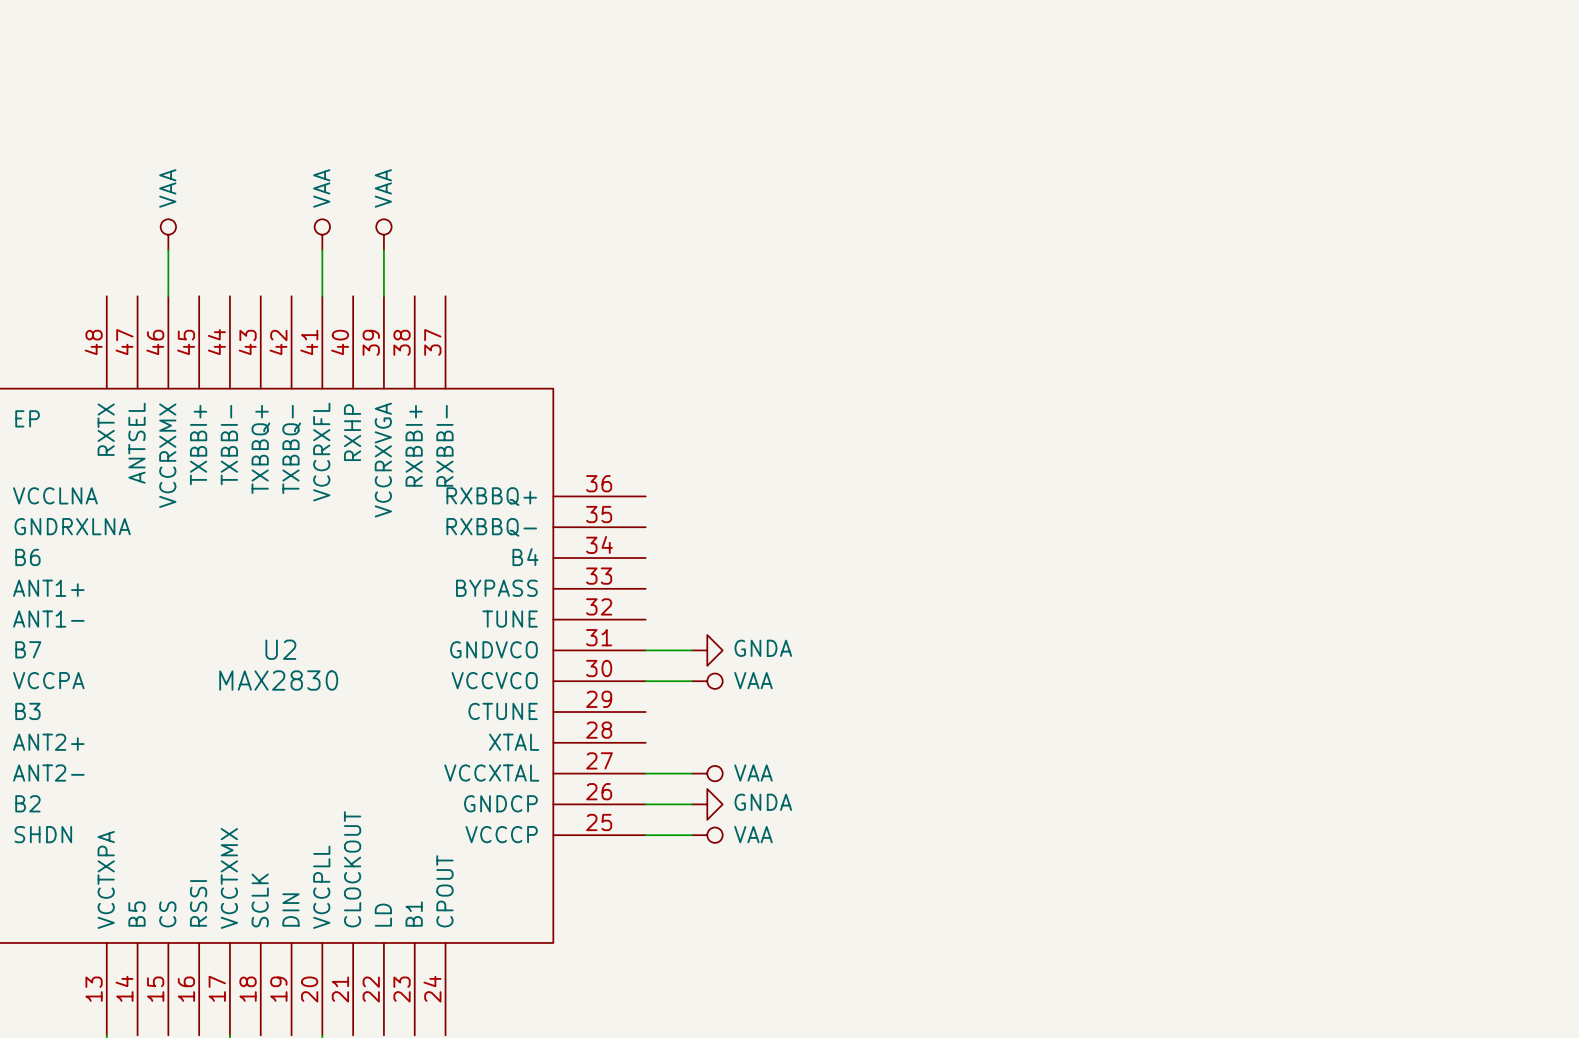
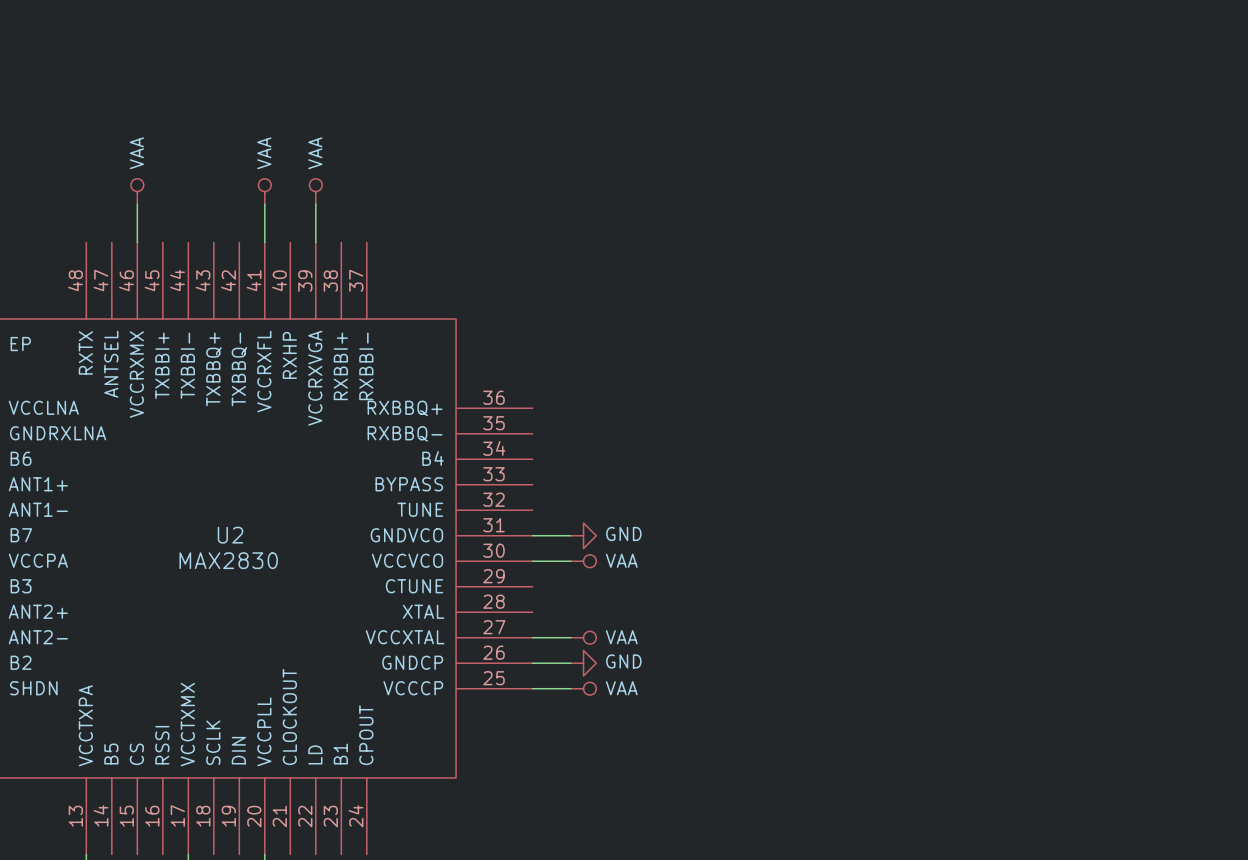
power symbol: GNDA (707, 650) -> GND (583, 535)
power symbol: GNDA (707, 804) -> GND (583, 663)

